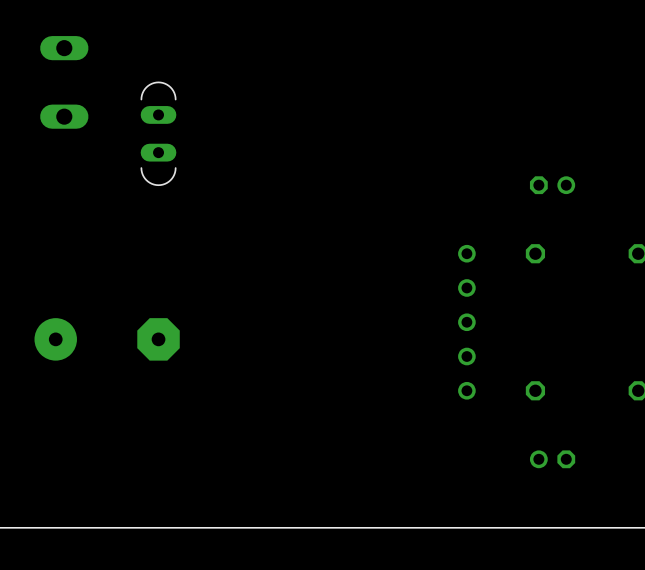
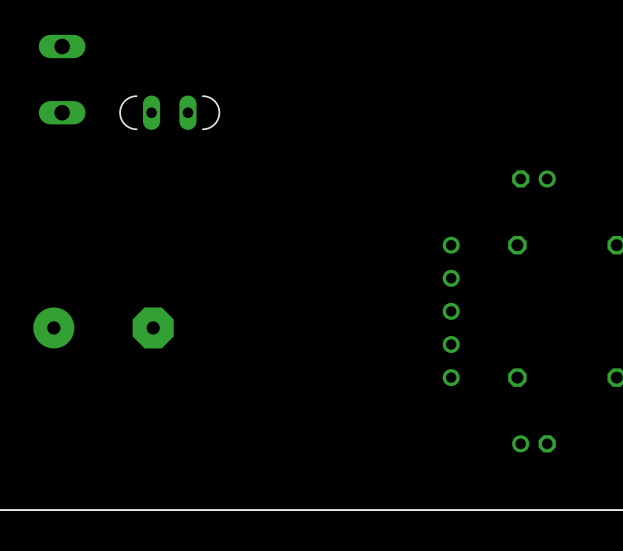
part rotation: 0° (158, 133) -> 90° clockwise (169, 112)

